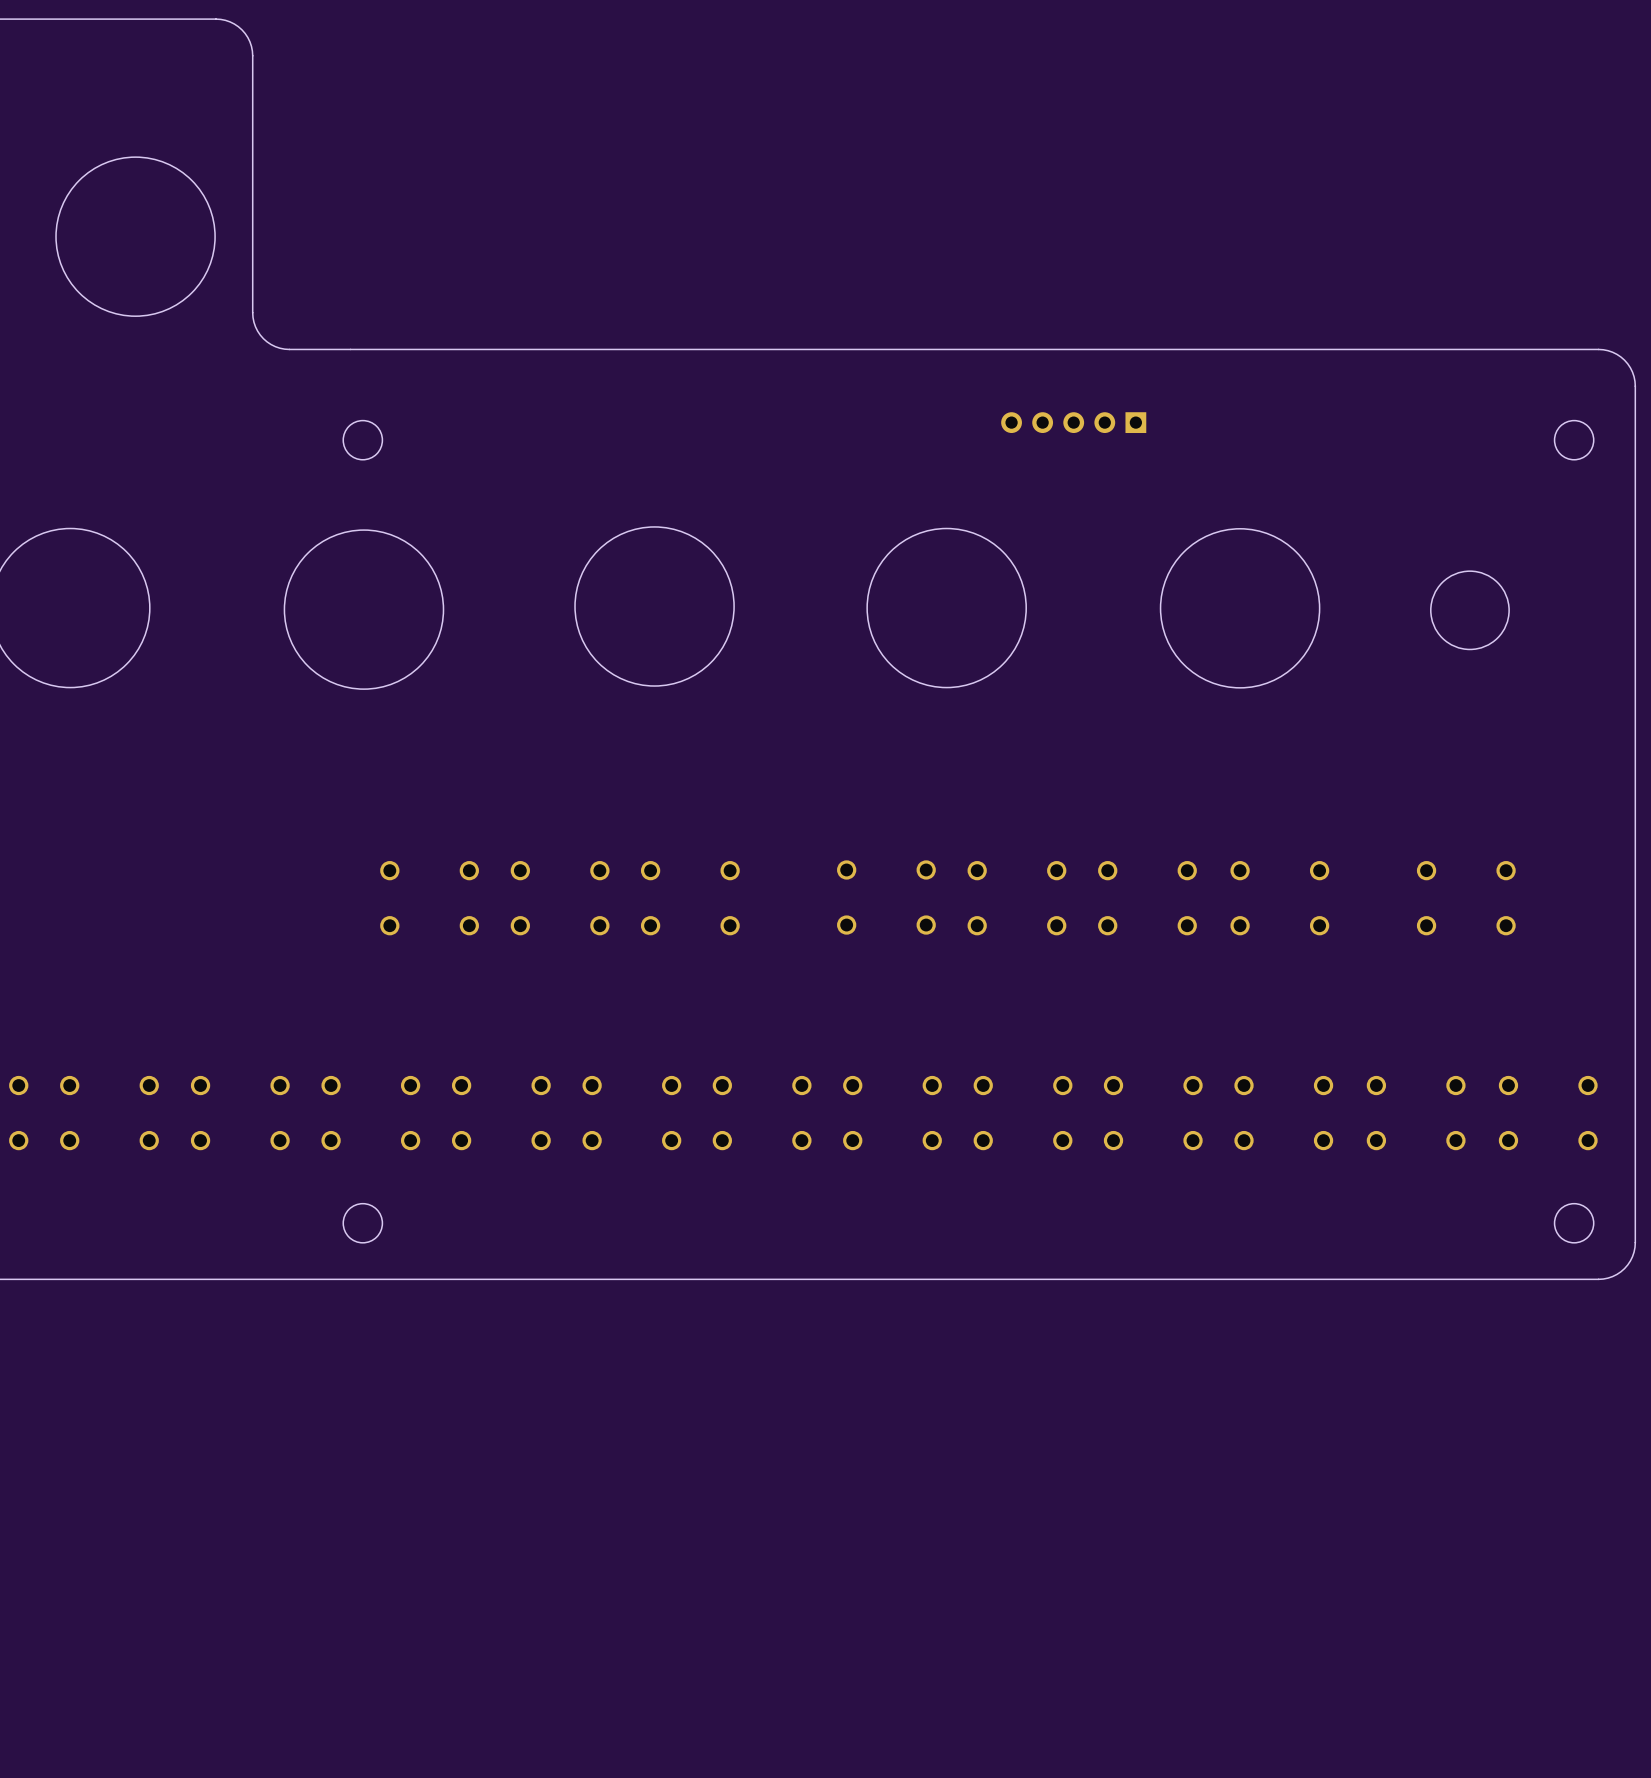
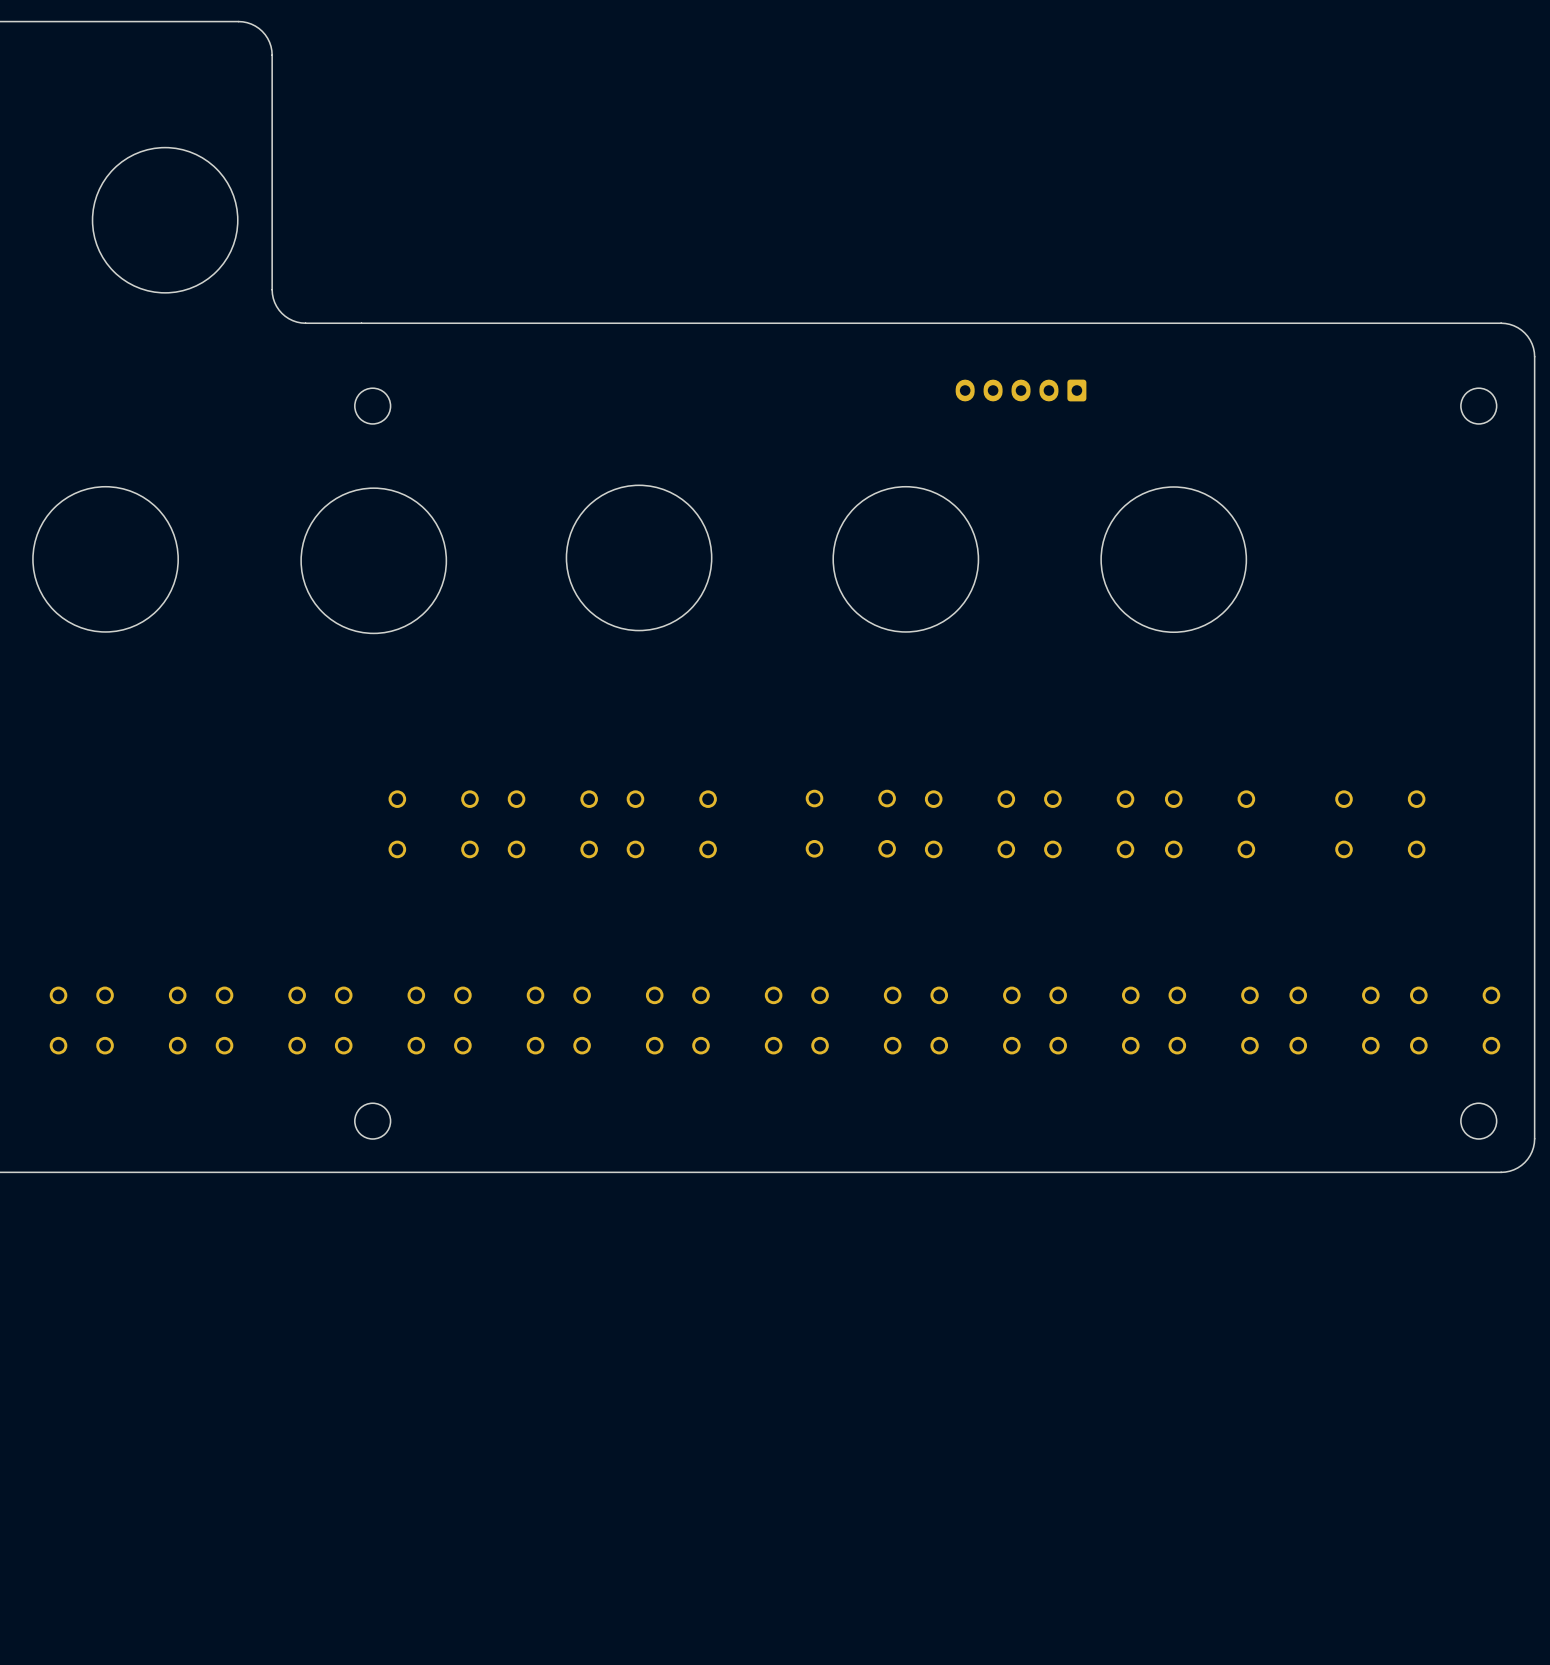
part footprint: [1001, 412, 1147, 434] -> [955, 379, 1087, 402]
round board edge: [1430, 570, 1510, 650] -> none

